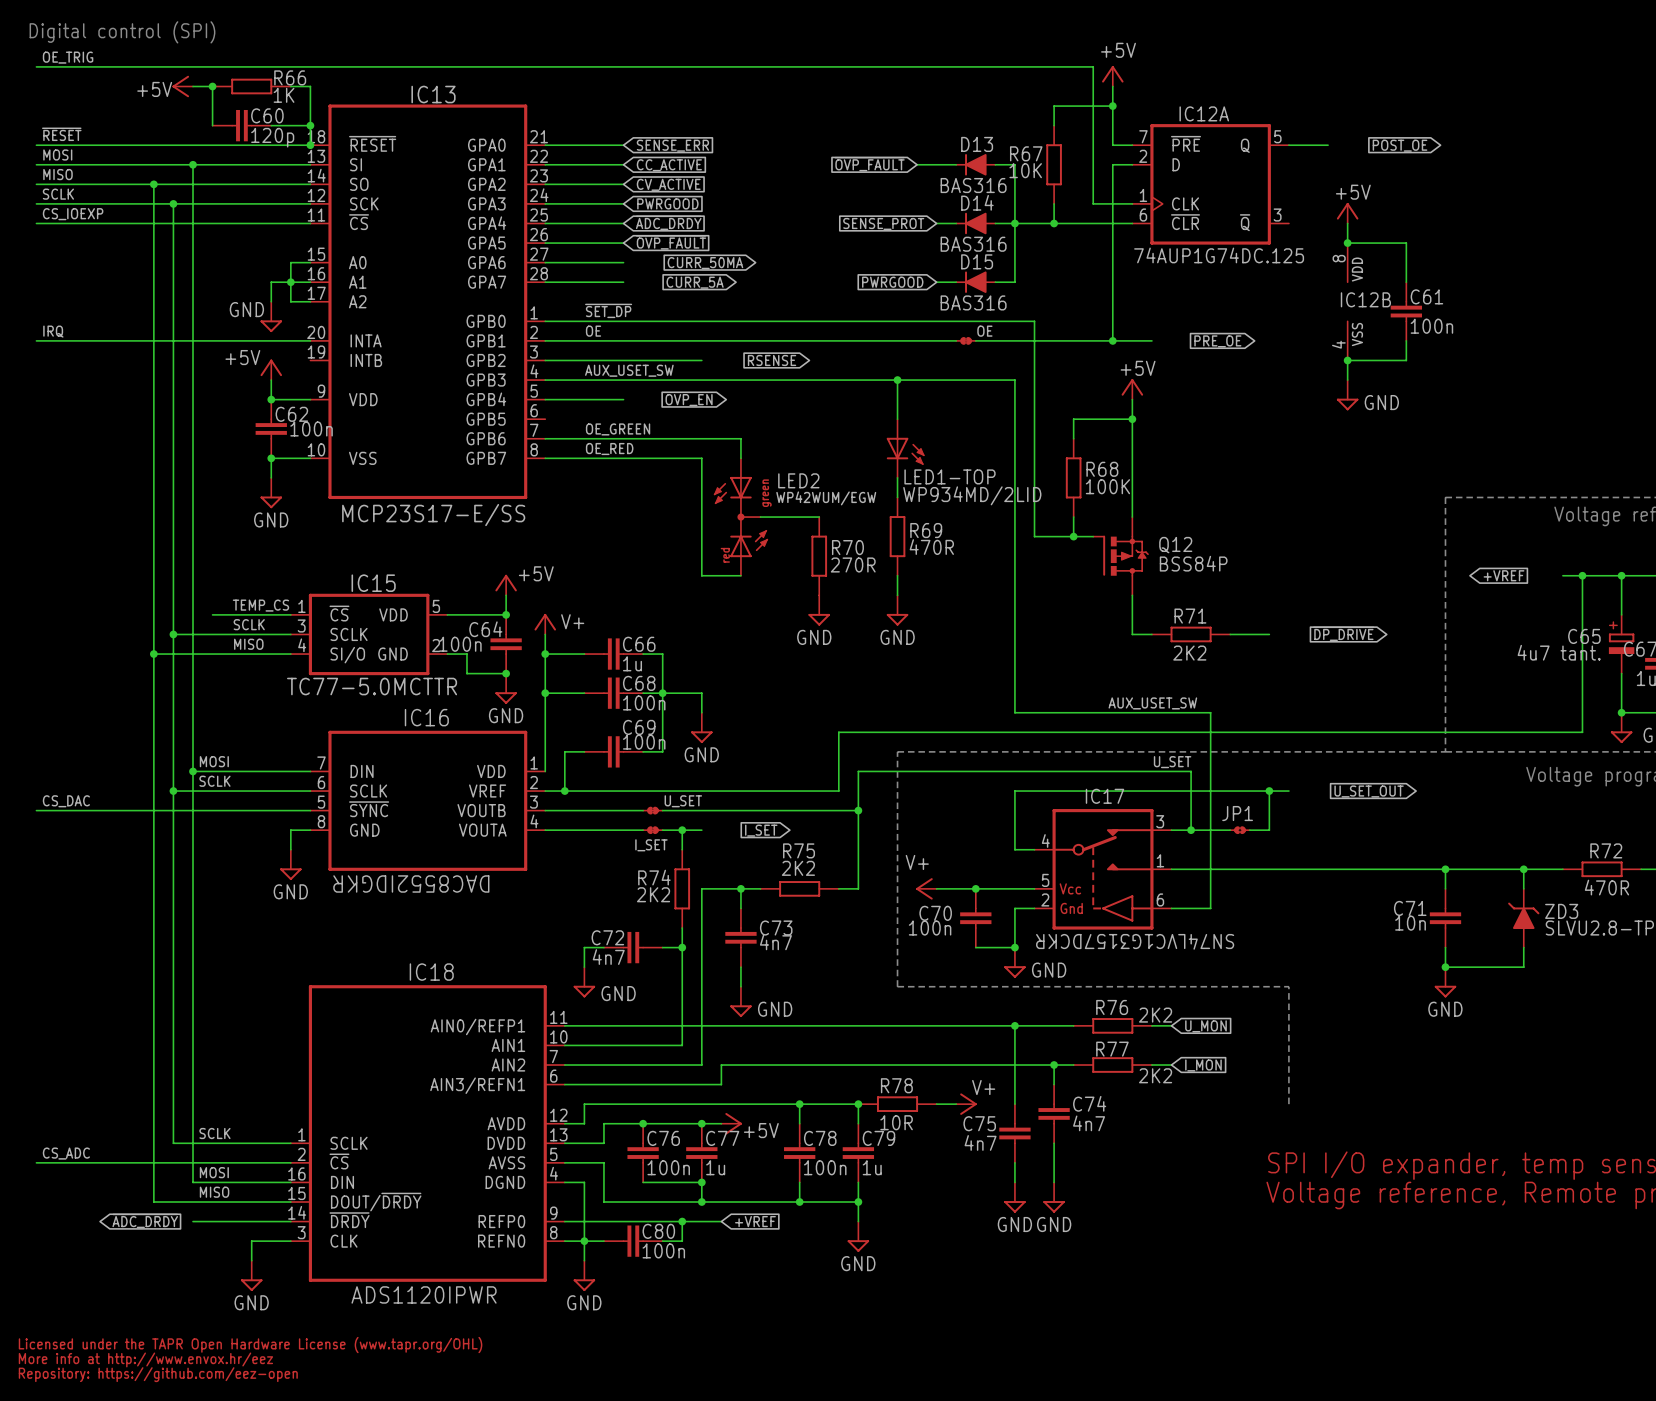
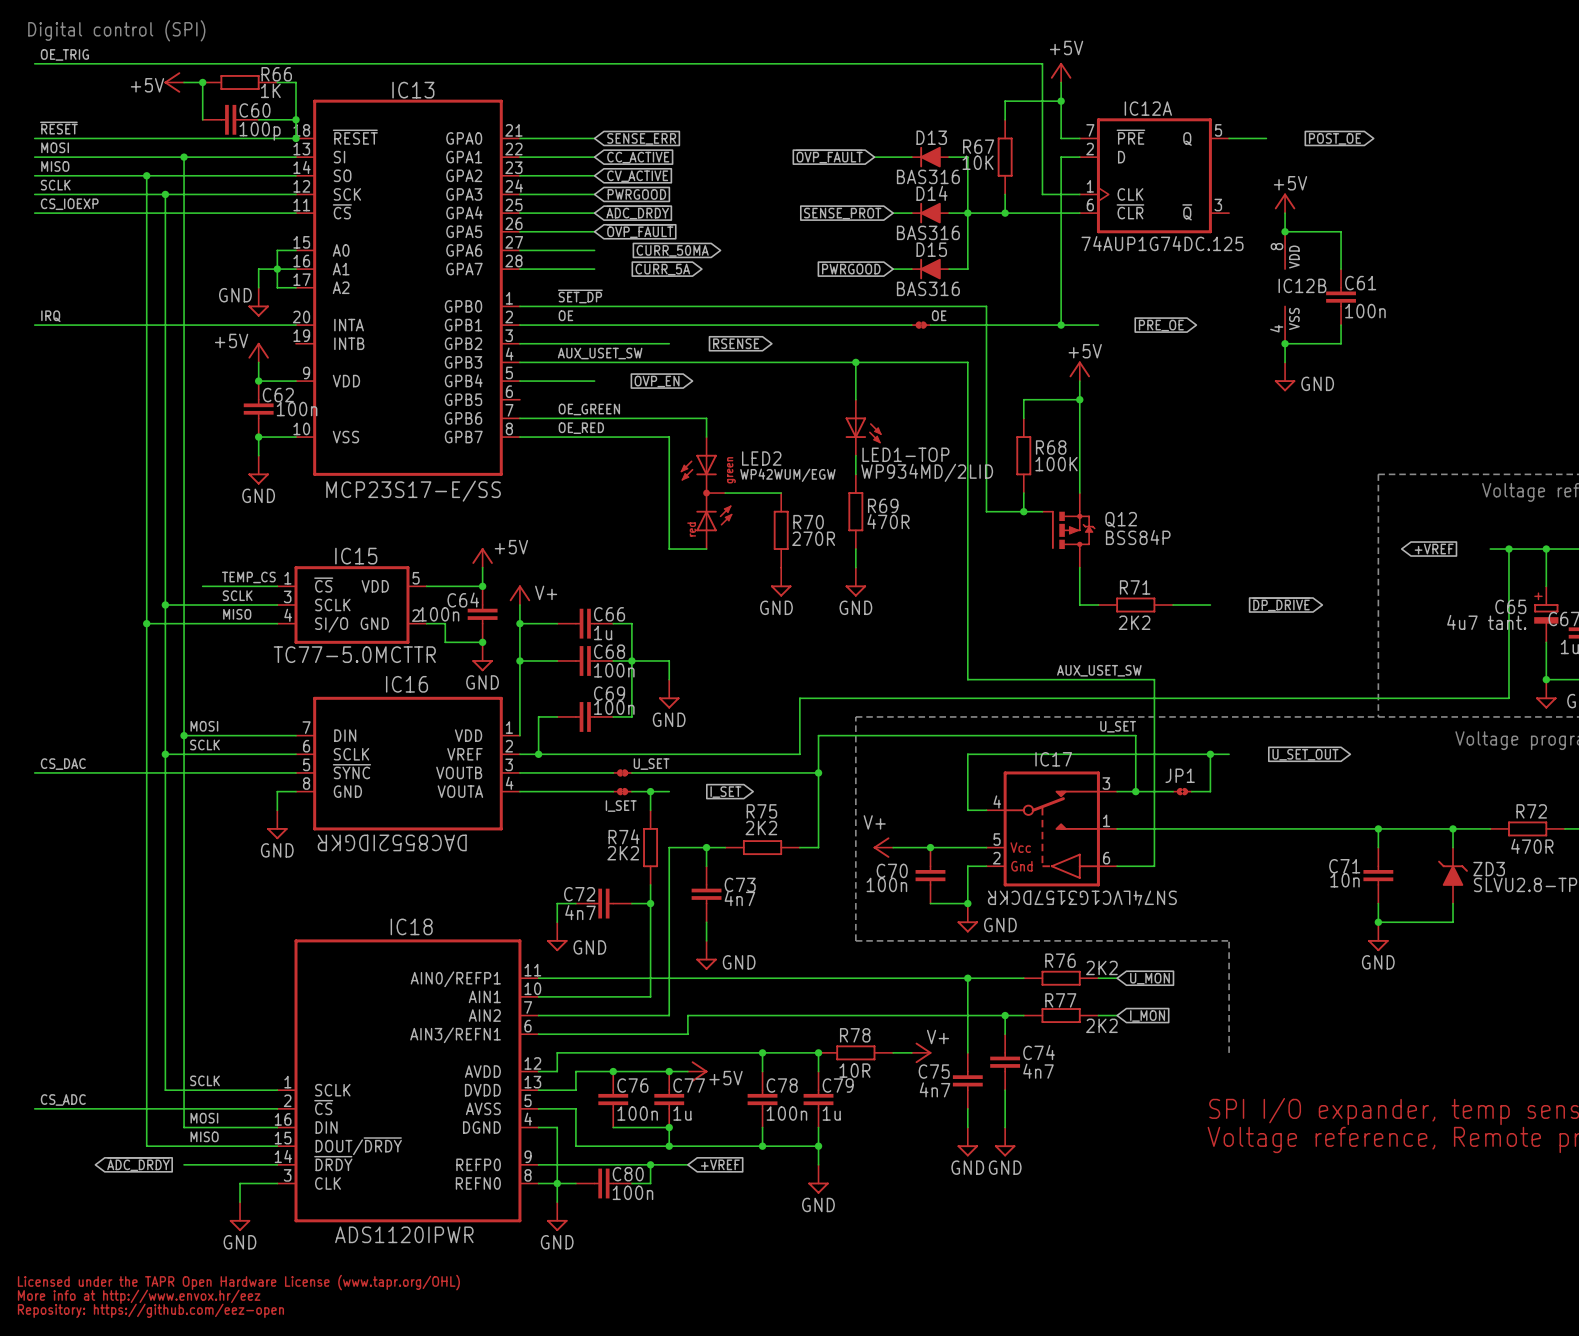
C60 value: 120p (272, 137) -> 100p (260, 131)

